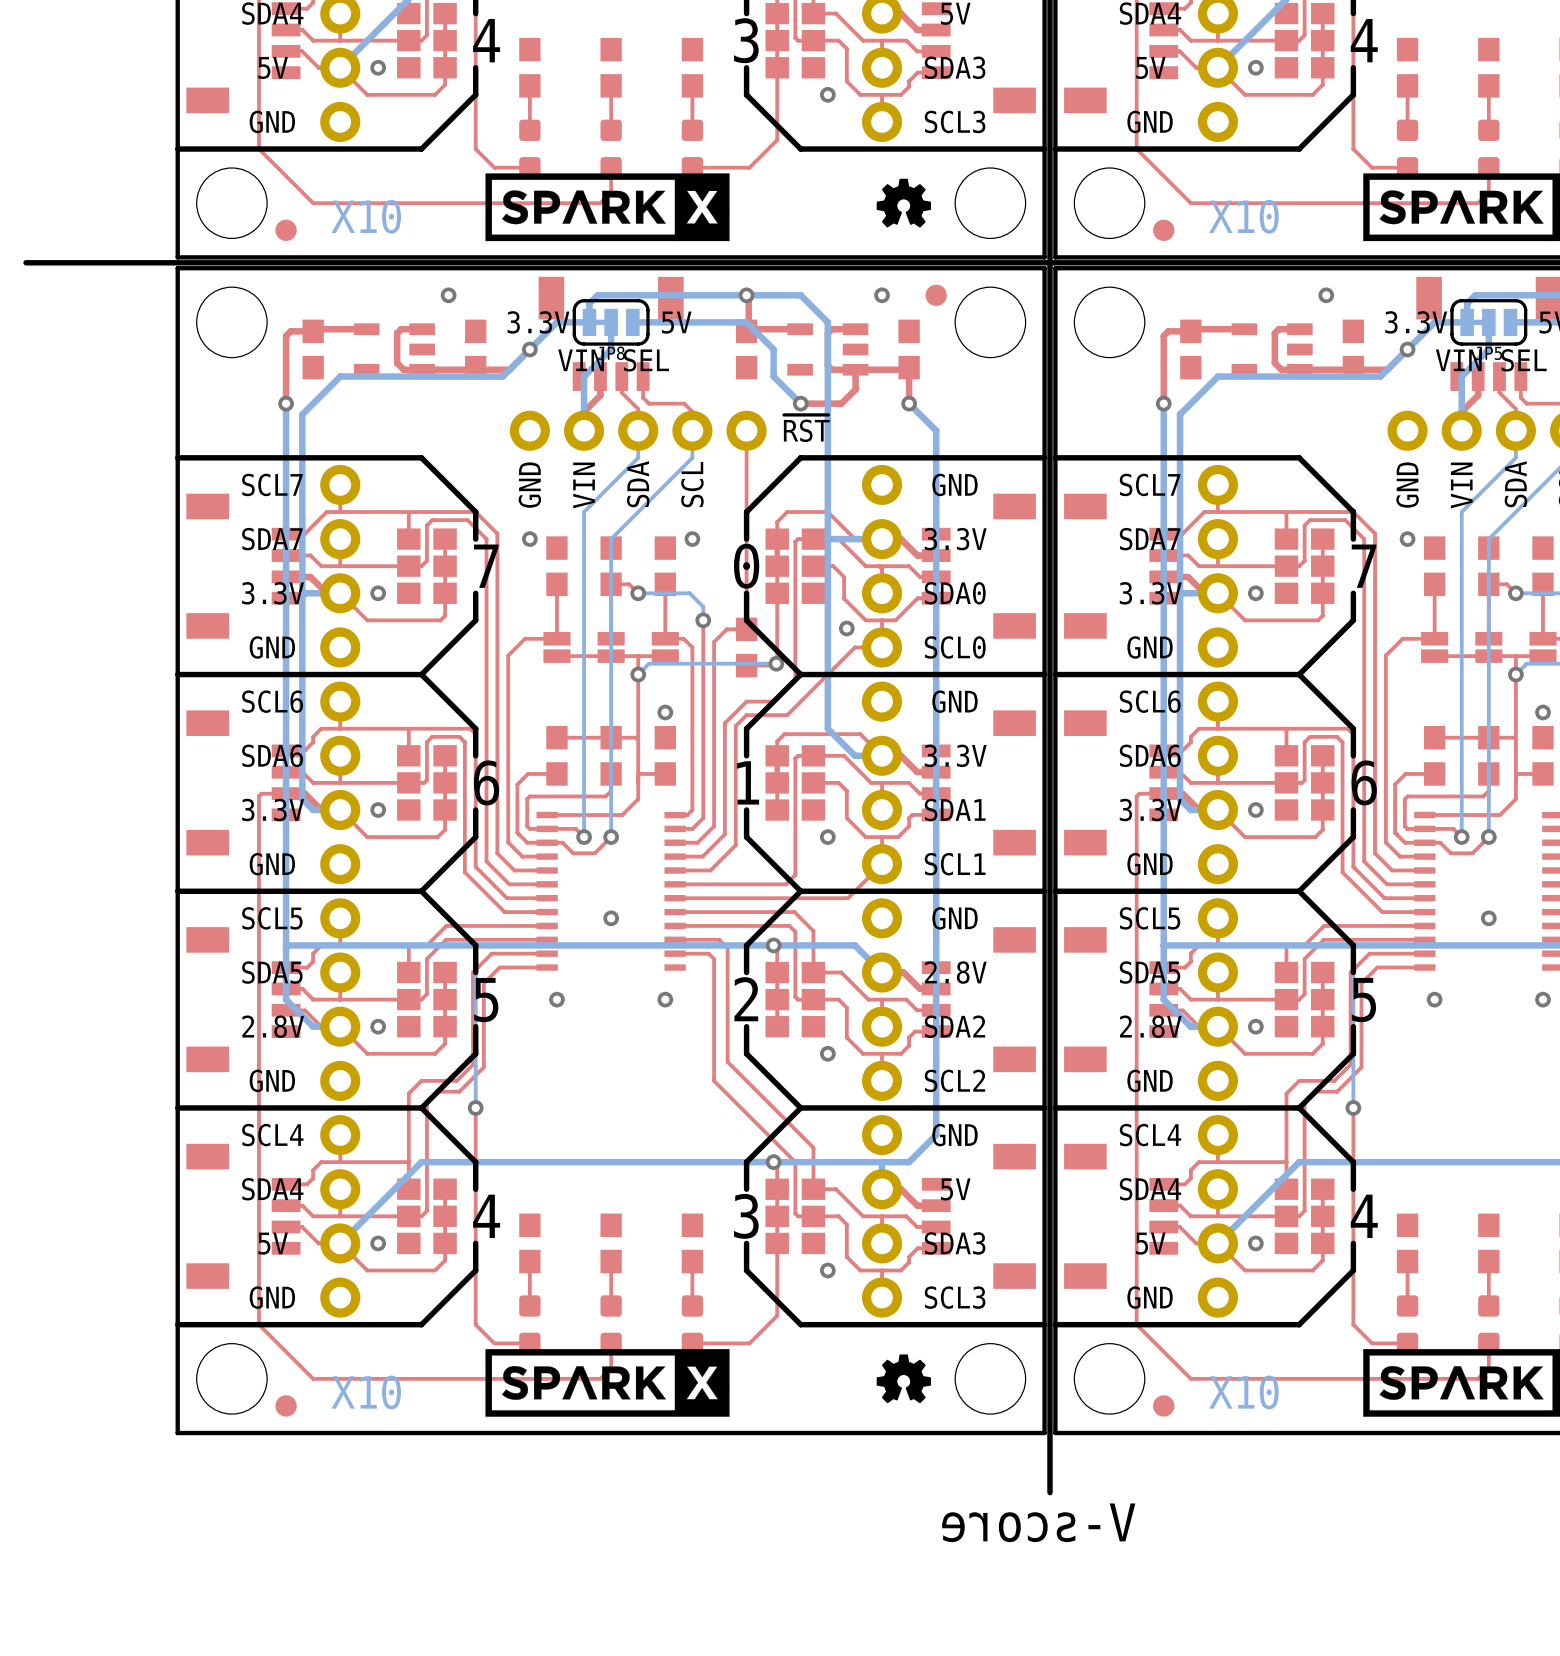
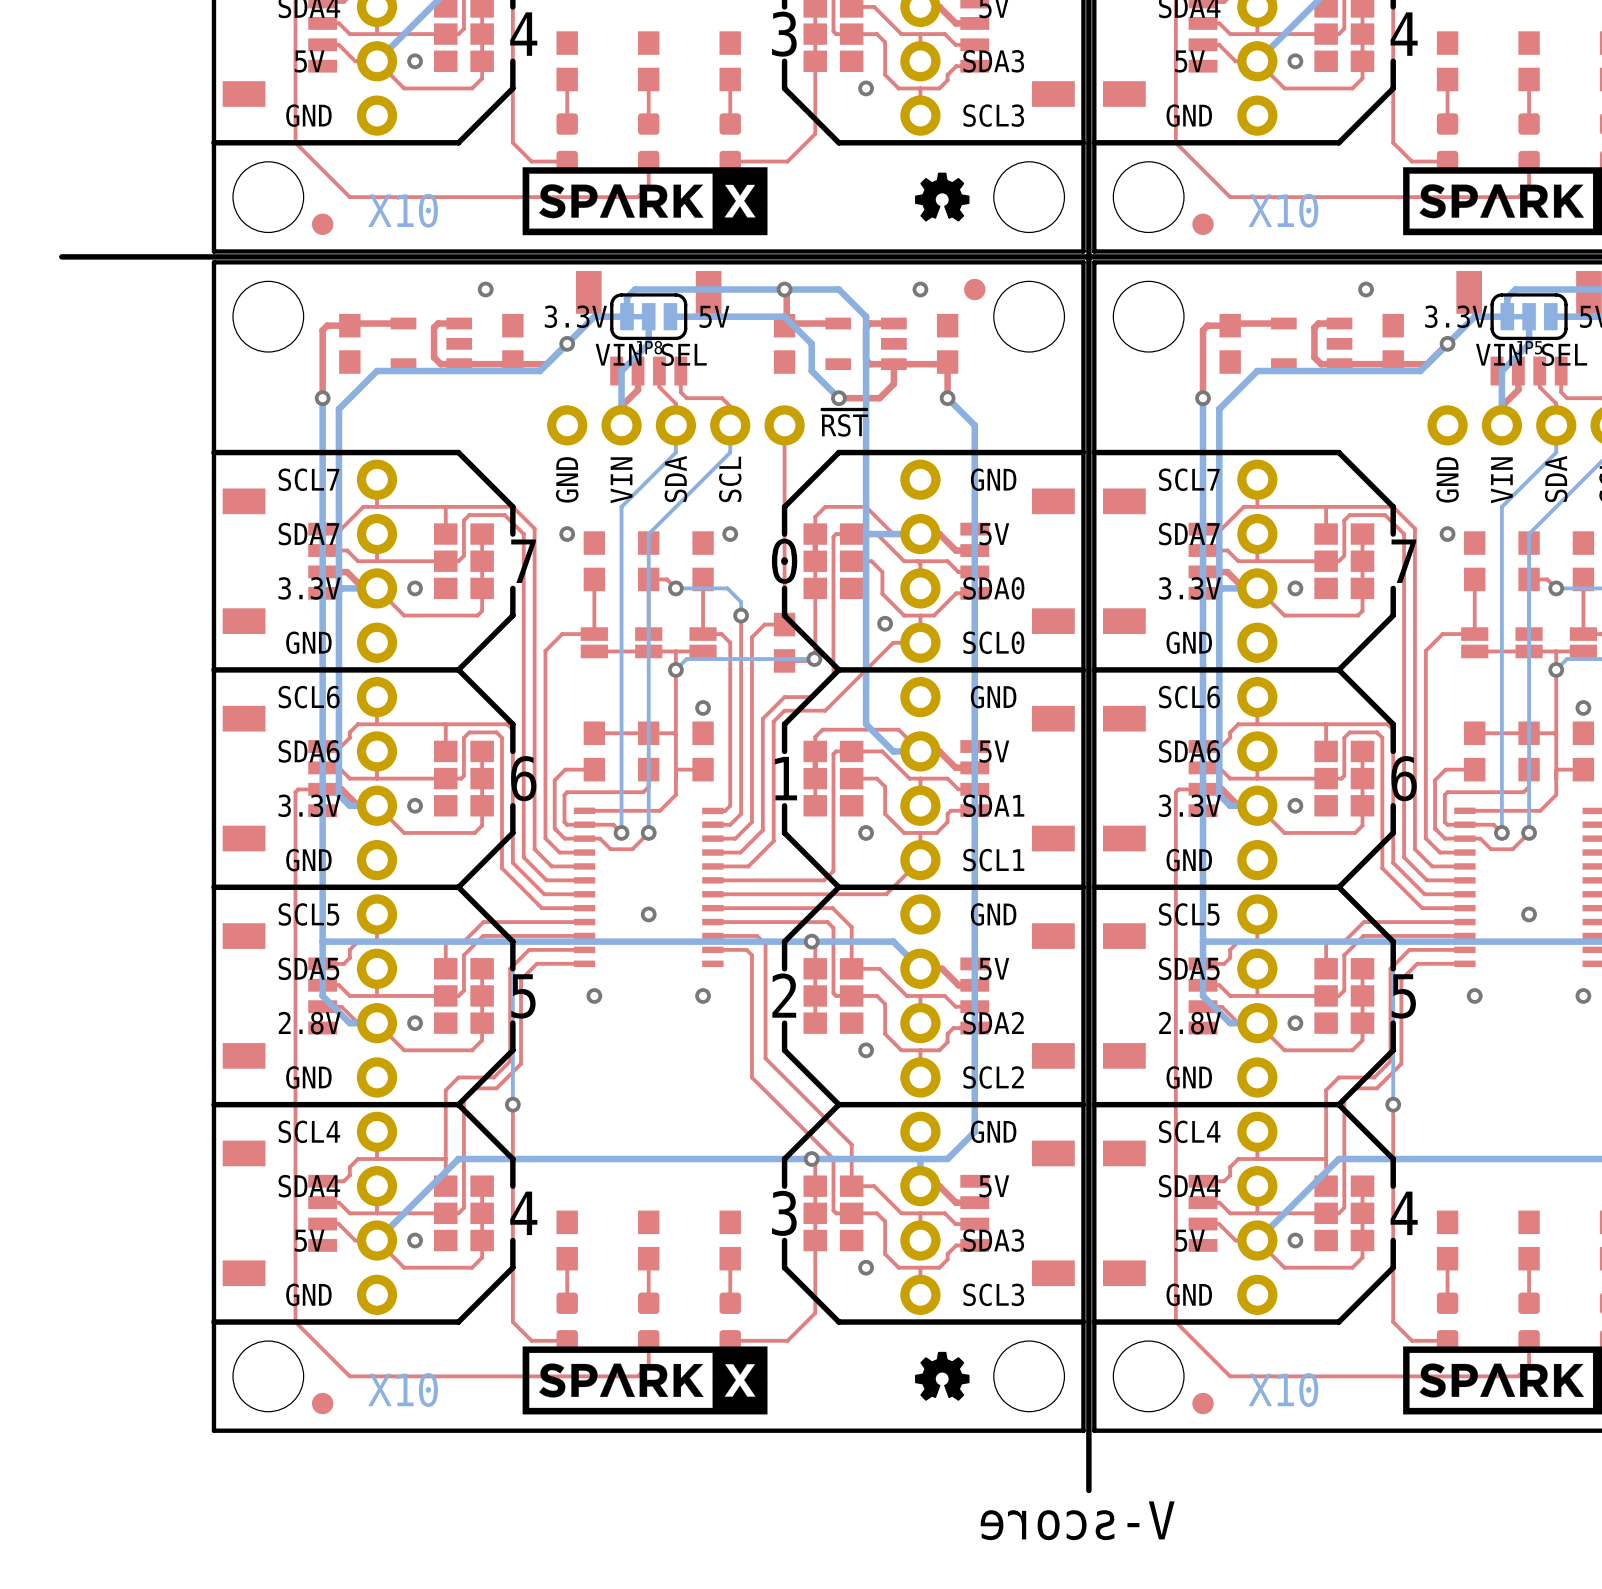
text: 3.3V (955, 539) -> 5V (994, 534)
text: 3.3V (955, 755) -> 5V (994, 751)
text: 2.8V (955, 972) -> 5V (994, 969)

